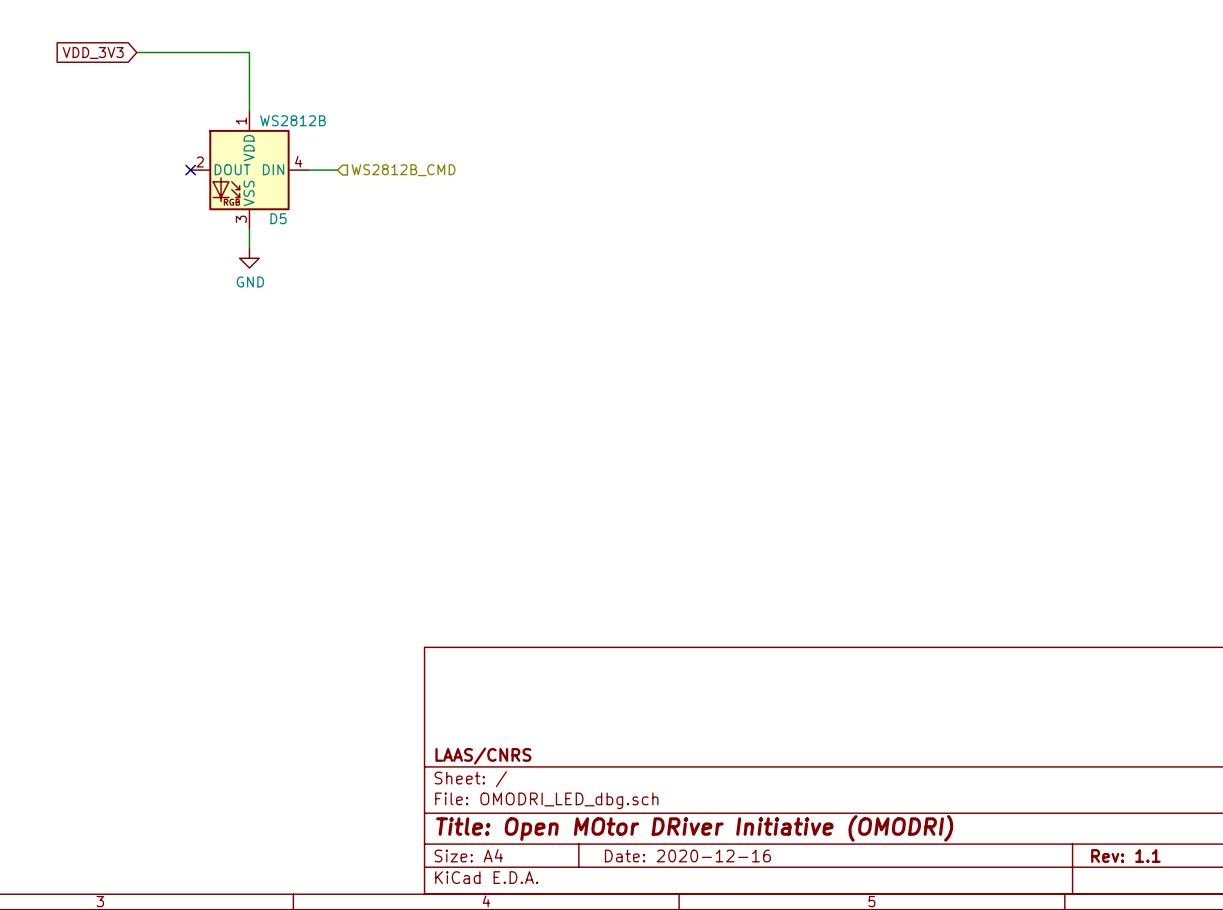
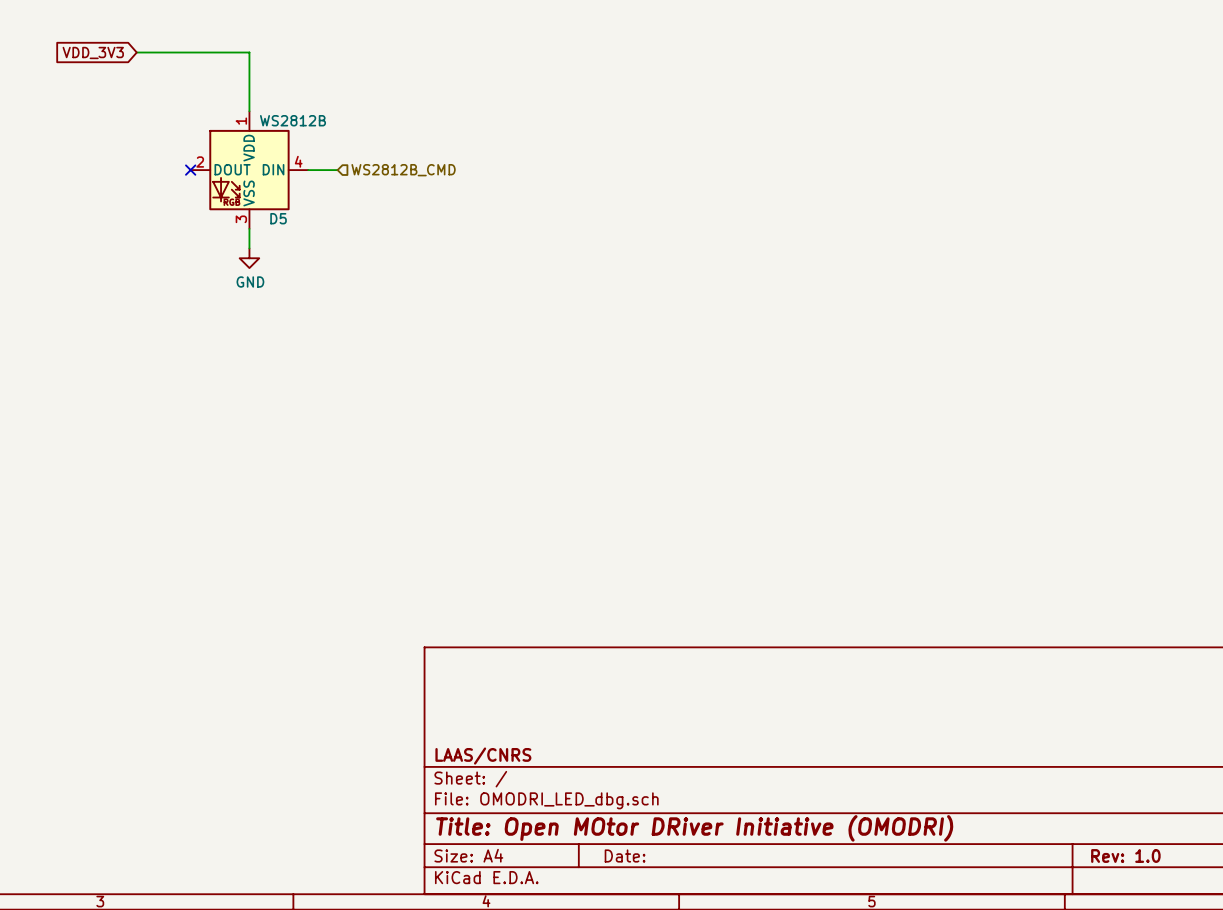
title block: Date: 2020-12-16 (687, 855) -> Date: (625, 855)
title block: Rev: 1.1 (1125, 855) -> Rev: 1.0 (1125, 855)

